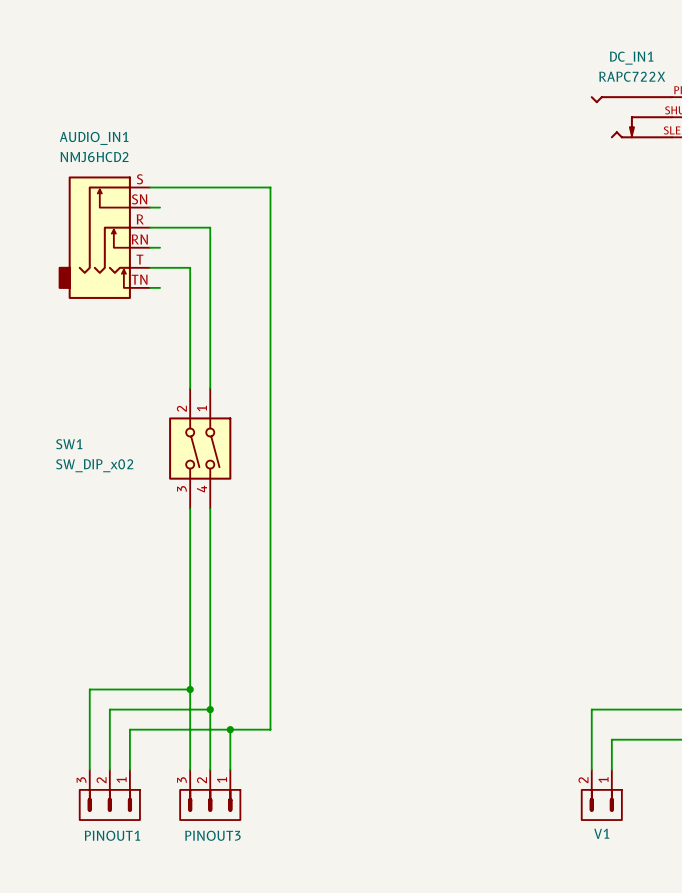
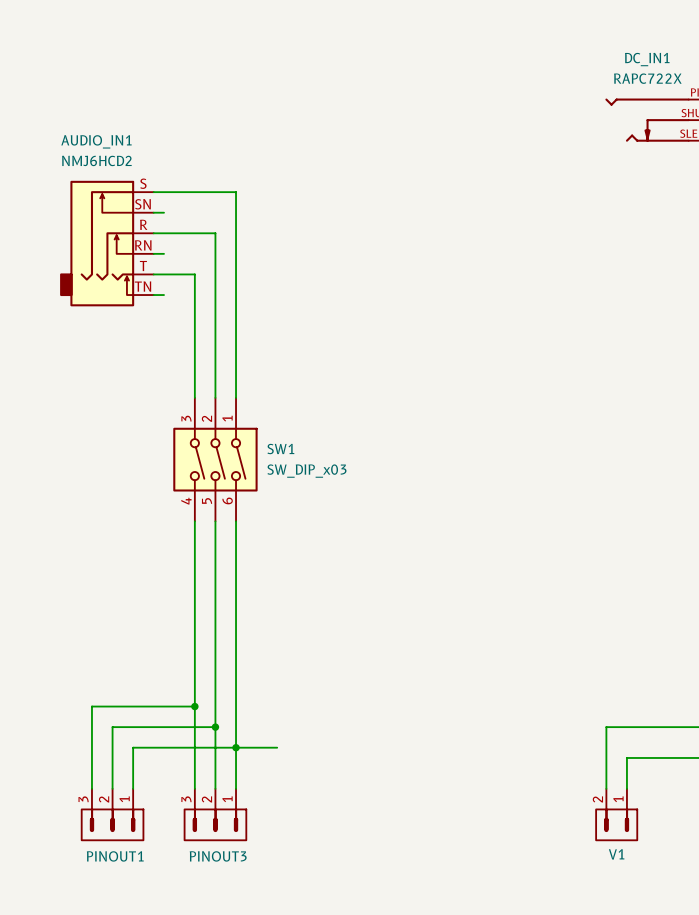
wire: (230, 187) (270, 187) (270, 729) -> (236, 192) (236, 397)
SW1 symbol: [169, 388, 232, 509] -> [173, 397, 258, 522]
SW1 name position: SW1 (69, 444) -> SW1 (280, 449)
SW1 value: SW_DIP_x02 (94, 465) -> SW_DIP_x03 (306, 471)
wire: none -> (236, 521) (236, 747)

